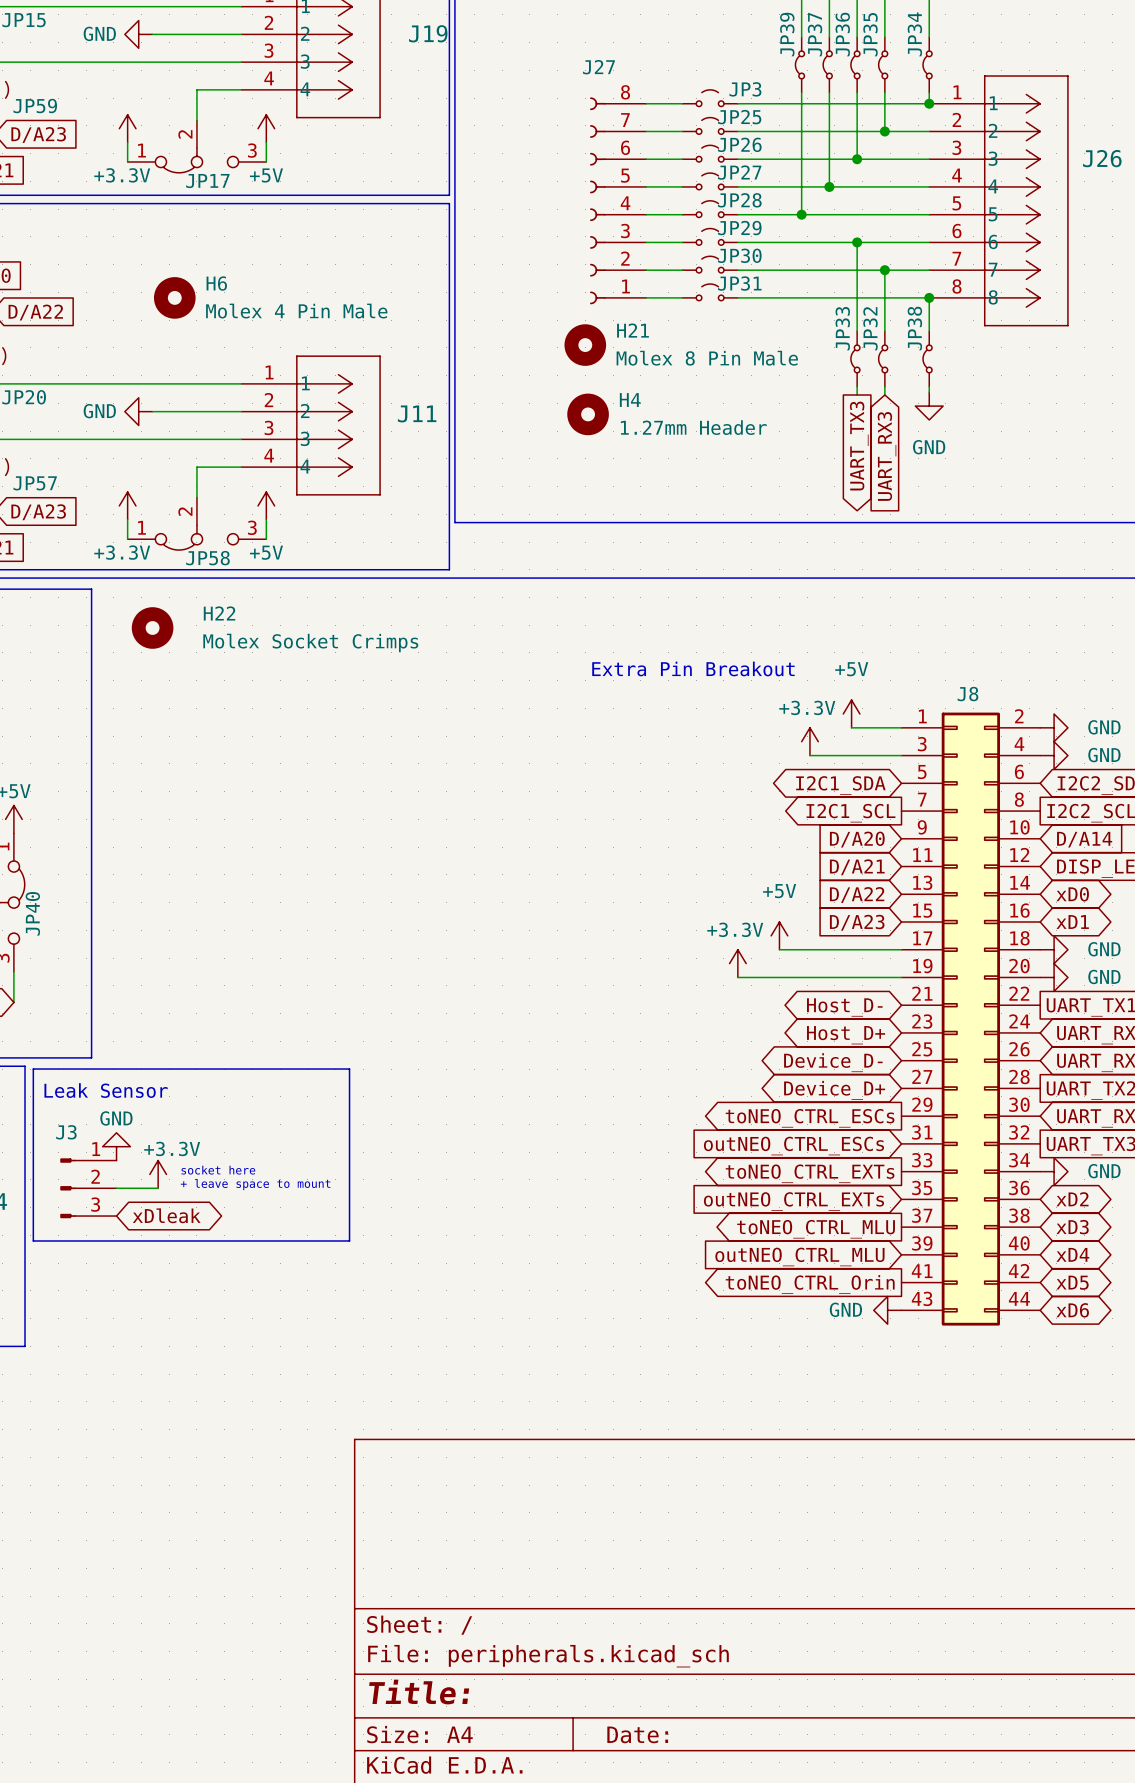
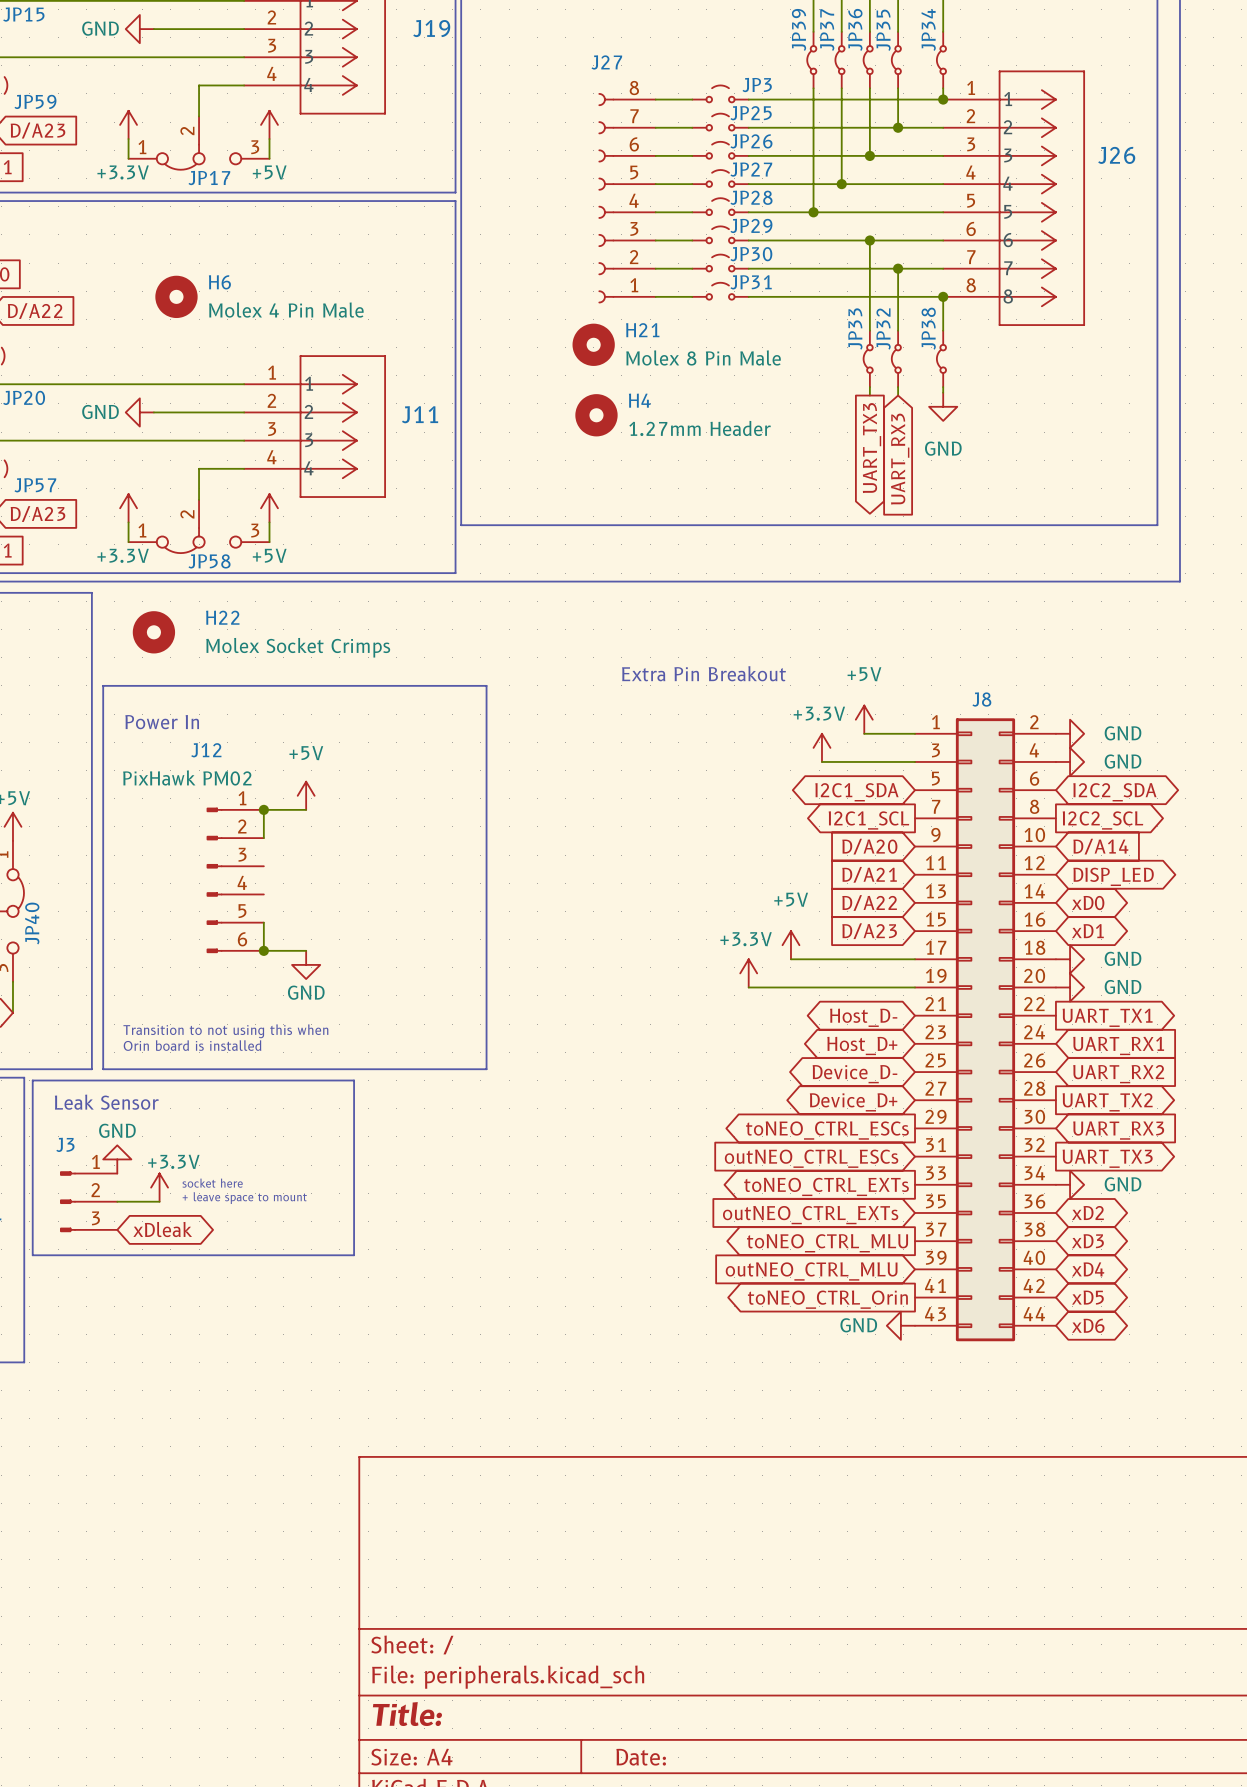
line: none -> (103, 685) (486, 685) (486, 1069) (103, 1069) (103, 685)
text: none -> Power In (162, 722)
power symbol: none -> +5V (306, 795)
junction: none -> (263, 809)
wire: none -> (306, 809) (263, 809) (263, 838)
J12: none -> PixHawk PM02 (235, 880)
wire: none -> (263, 922) (263, 950) (306, 950)
junction: none -> (263, 950)
power symbol: none -> GND (306, 964)
text: none -> Transition to not using this when (225, 1031)
text: none -> Orin board is installed (192, 1045)

